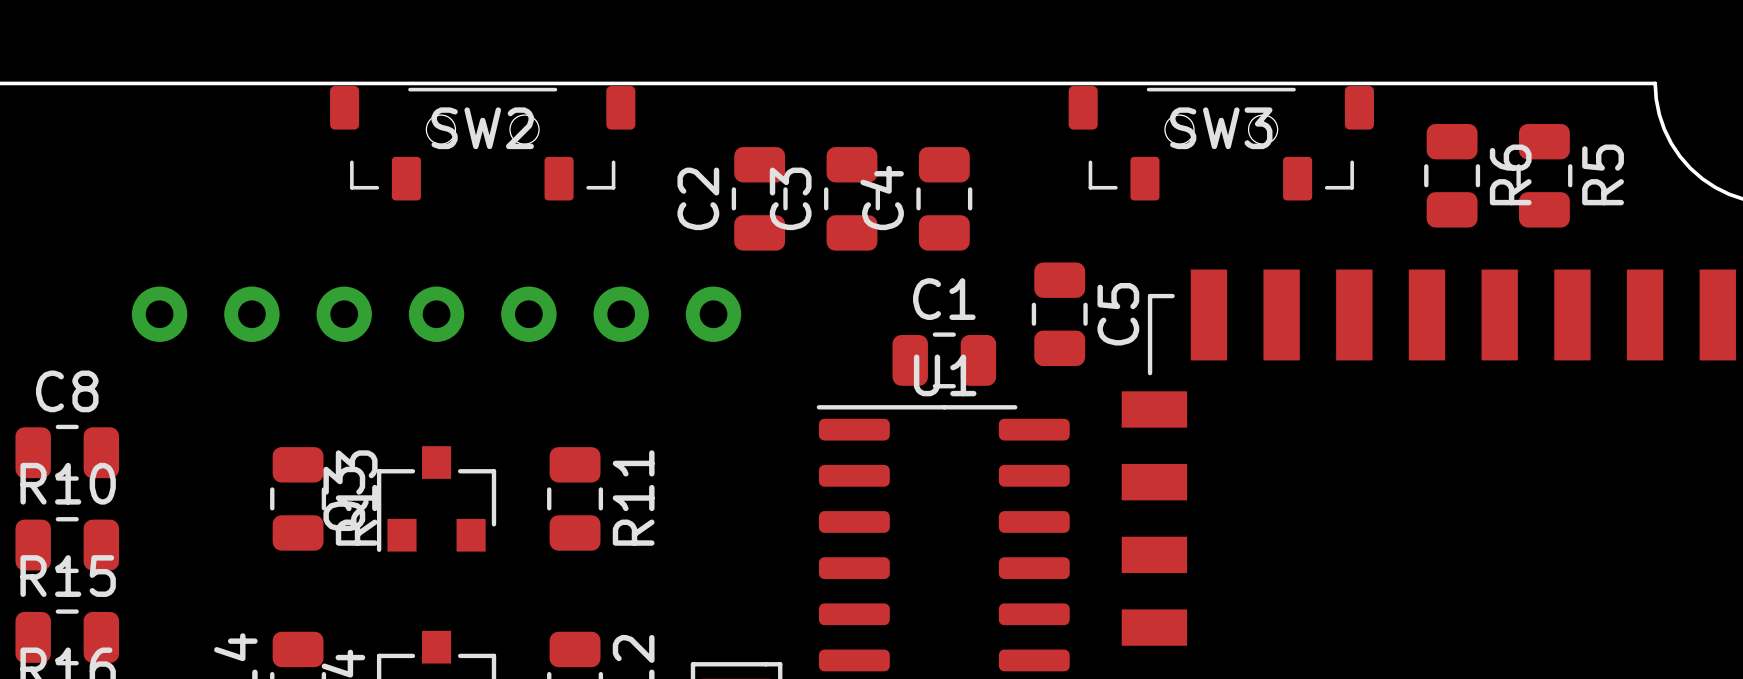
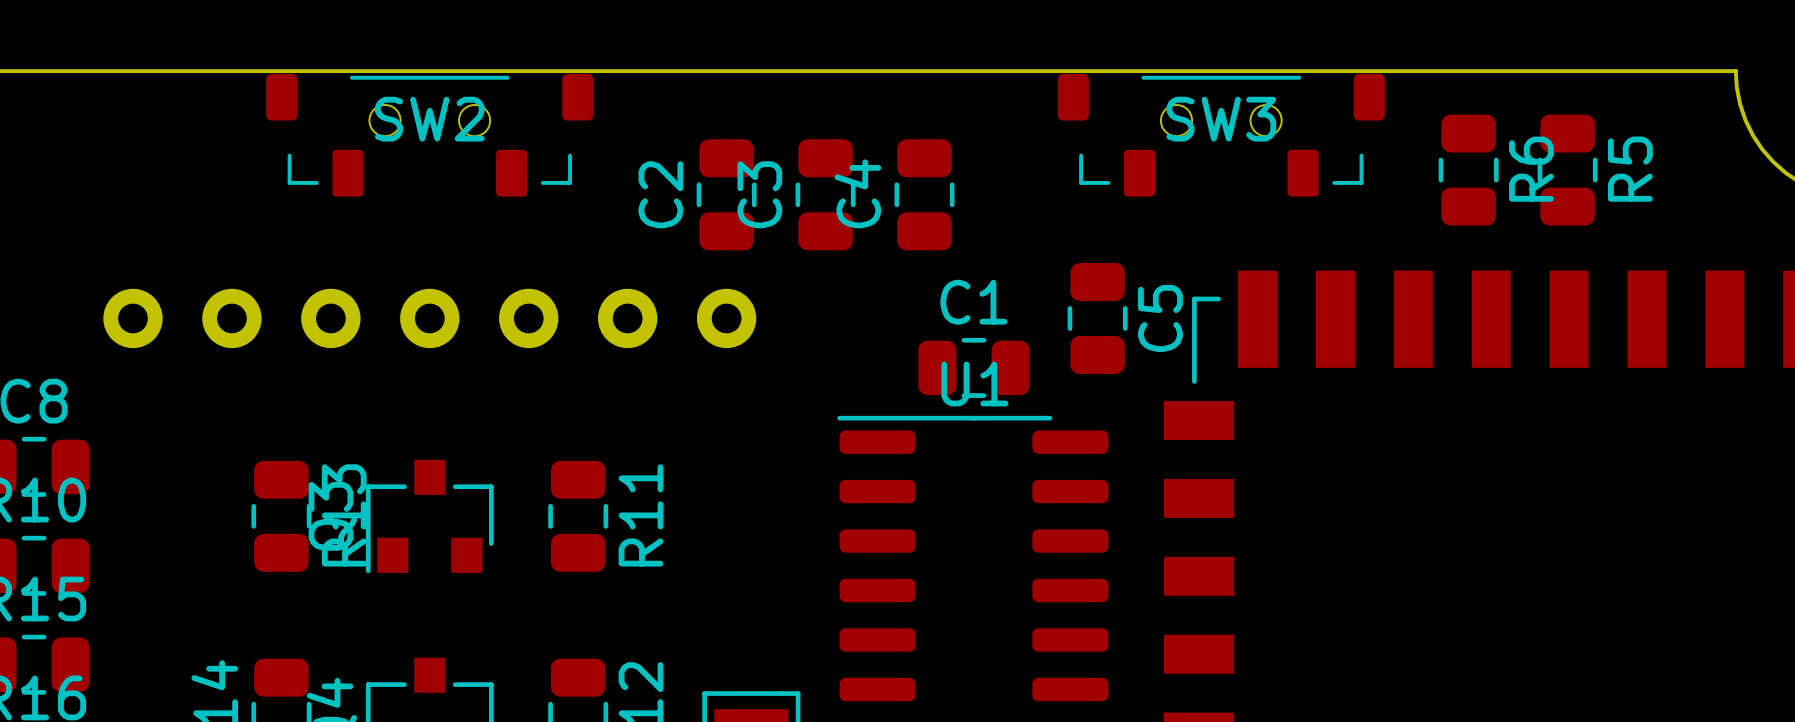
SW2 position: (482, 143) -> (429, 135)
SW3 position: (1221, 143) -> (1221, 135)
R6 position: (1452, 175) -> (1468, 170)
R5 position: (1544, 175) -> (1567, 170)
C2 position: (759, 198) -> (726, 194)
C3 position: (852, 198) -> (825, 194)
C4 position: (944, 198) -> (924, 194)

